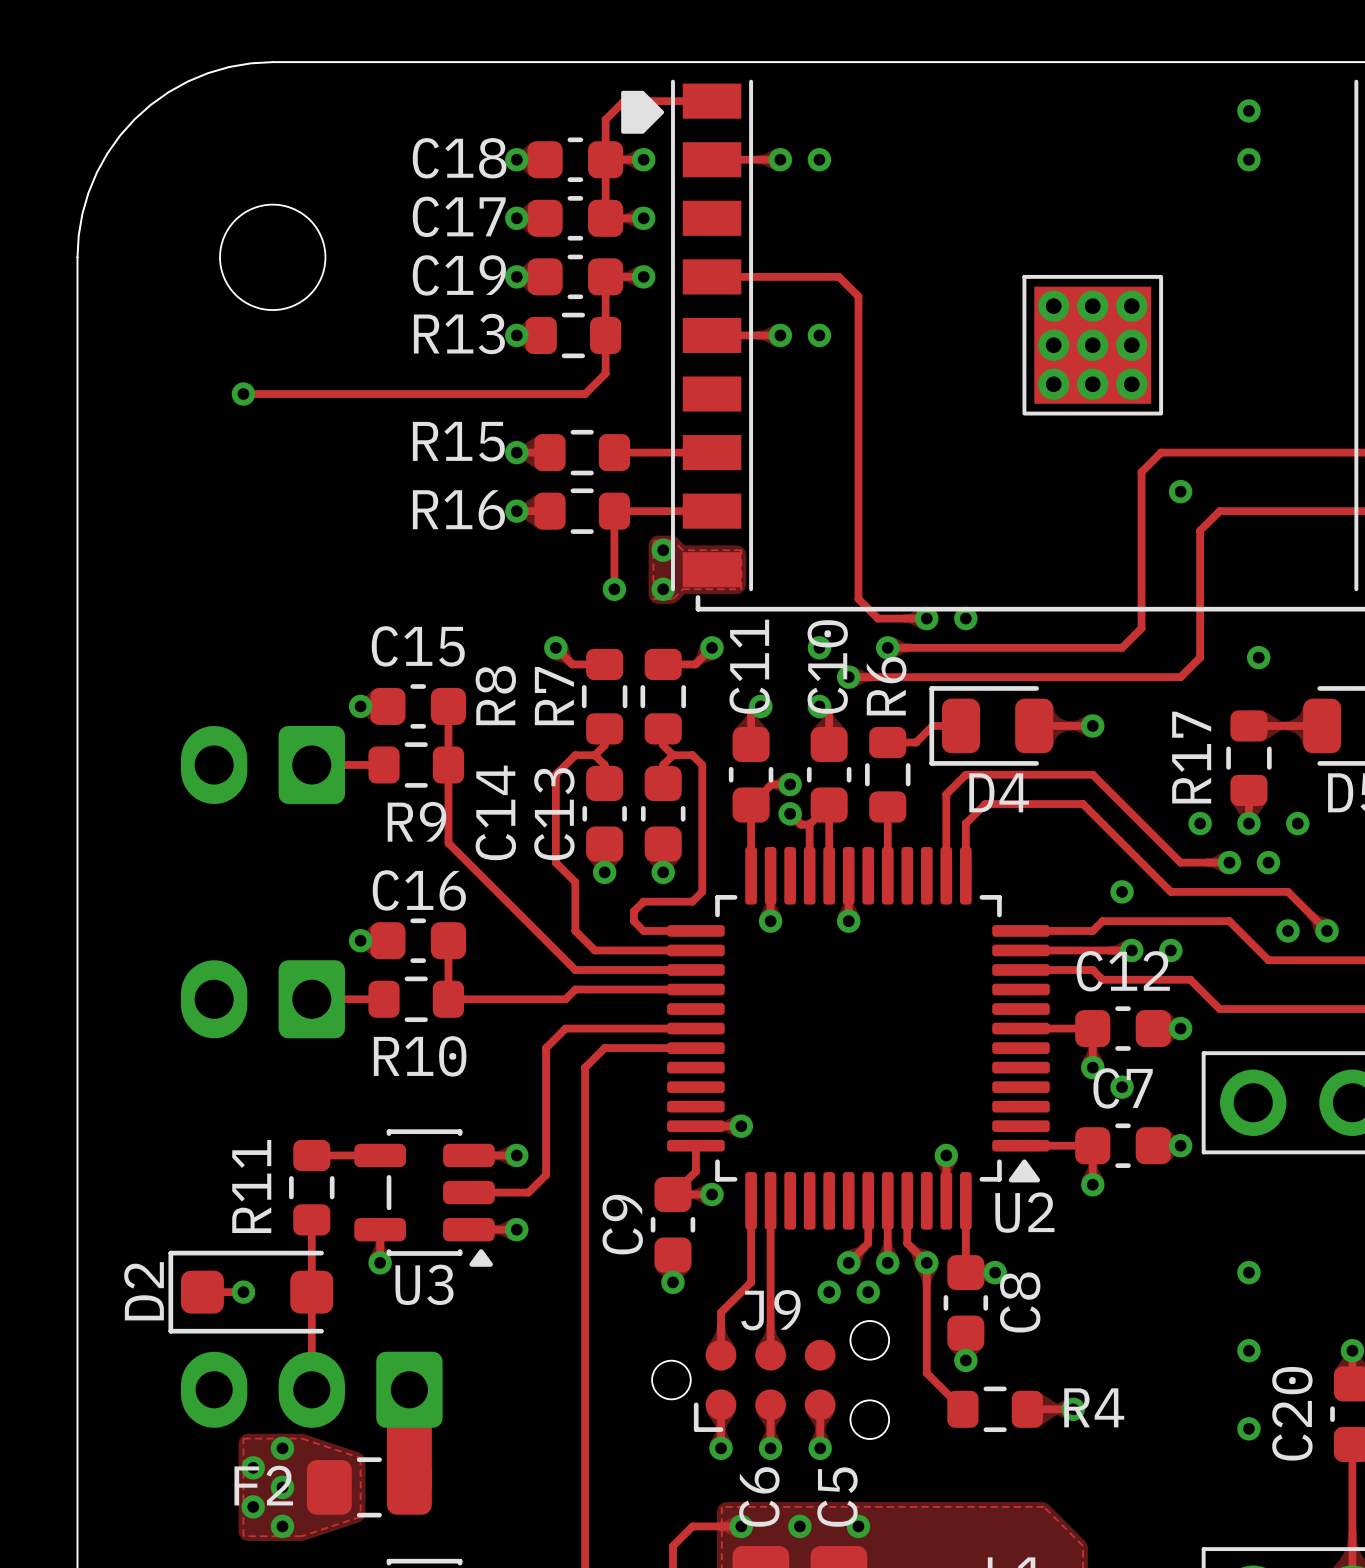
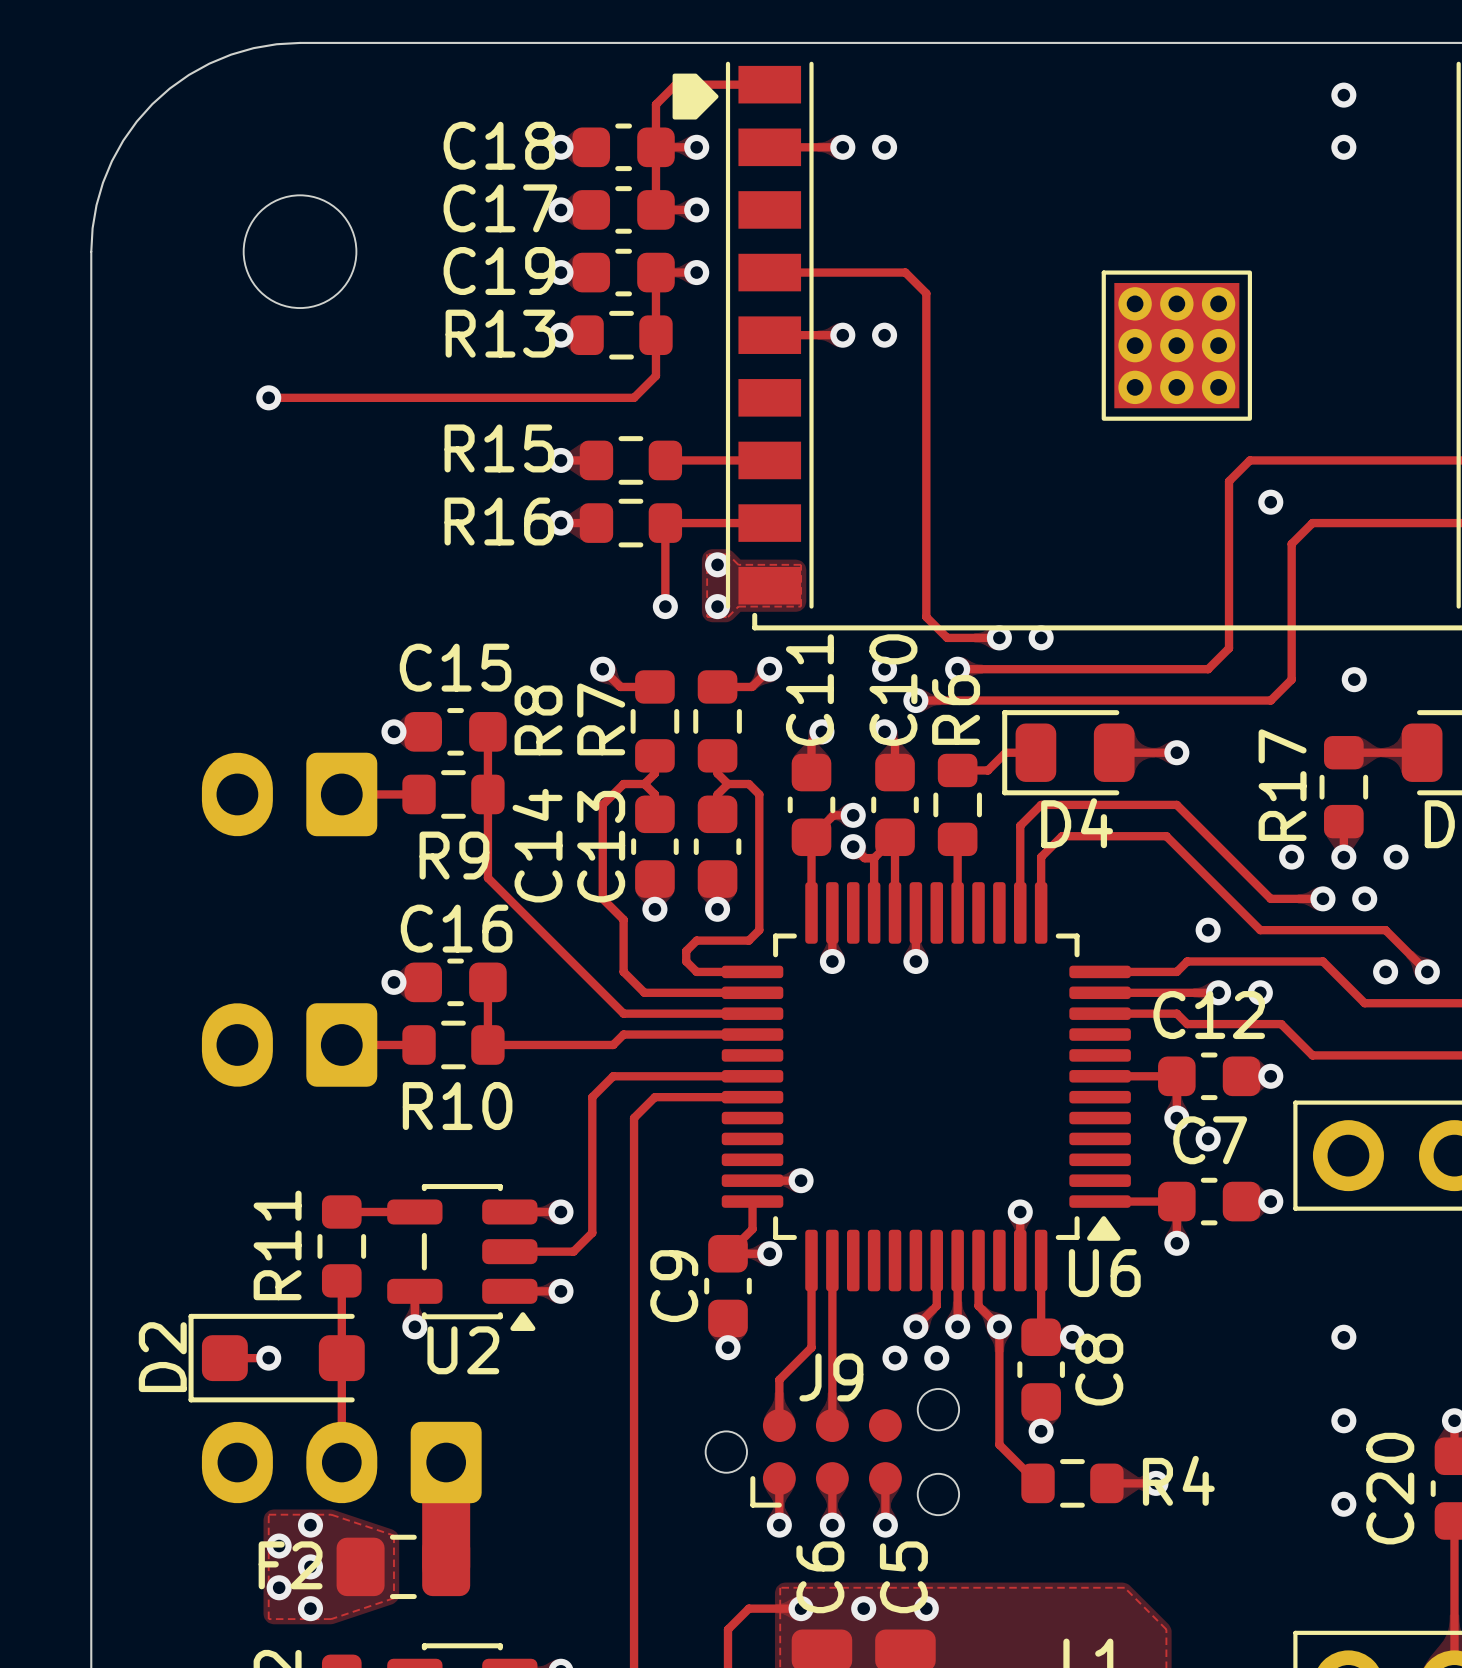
U2 name: U2 (1024, 1212) -> U6 (1104, 1273)
U3 name: U3 (424, 1284) -> U2 (463, 1350)

